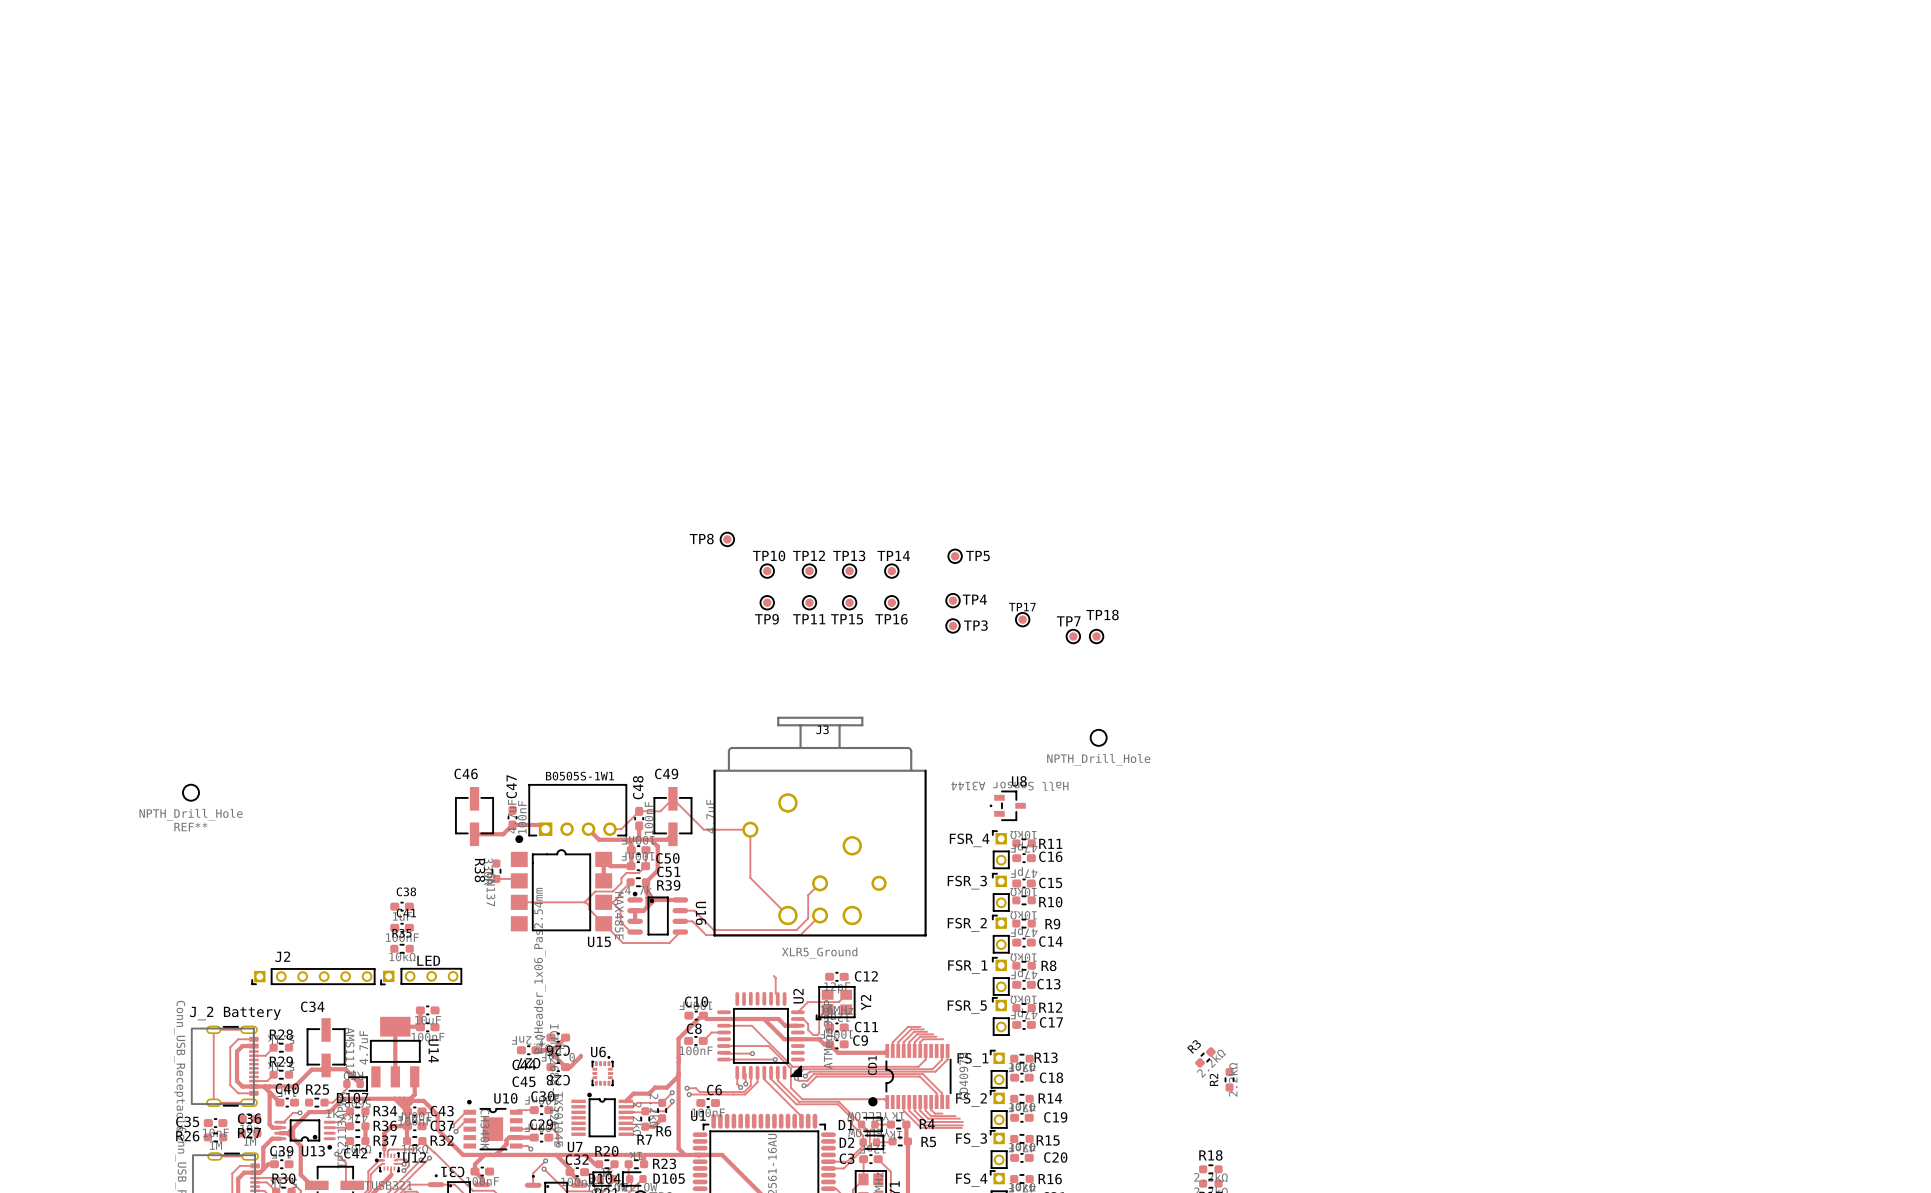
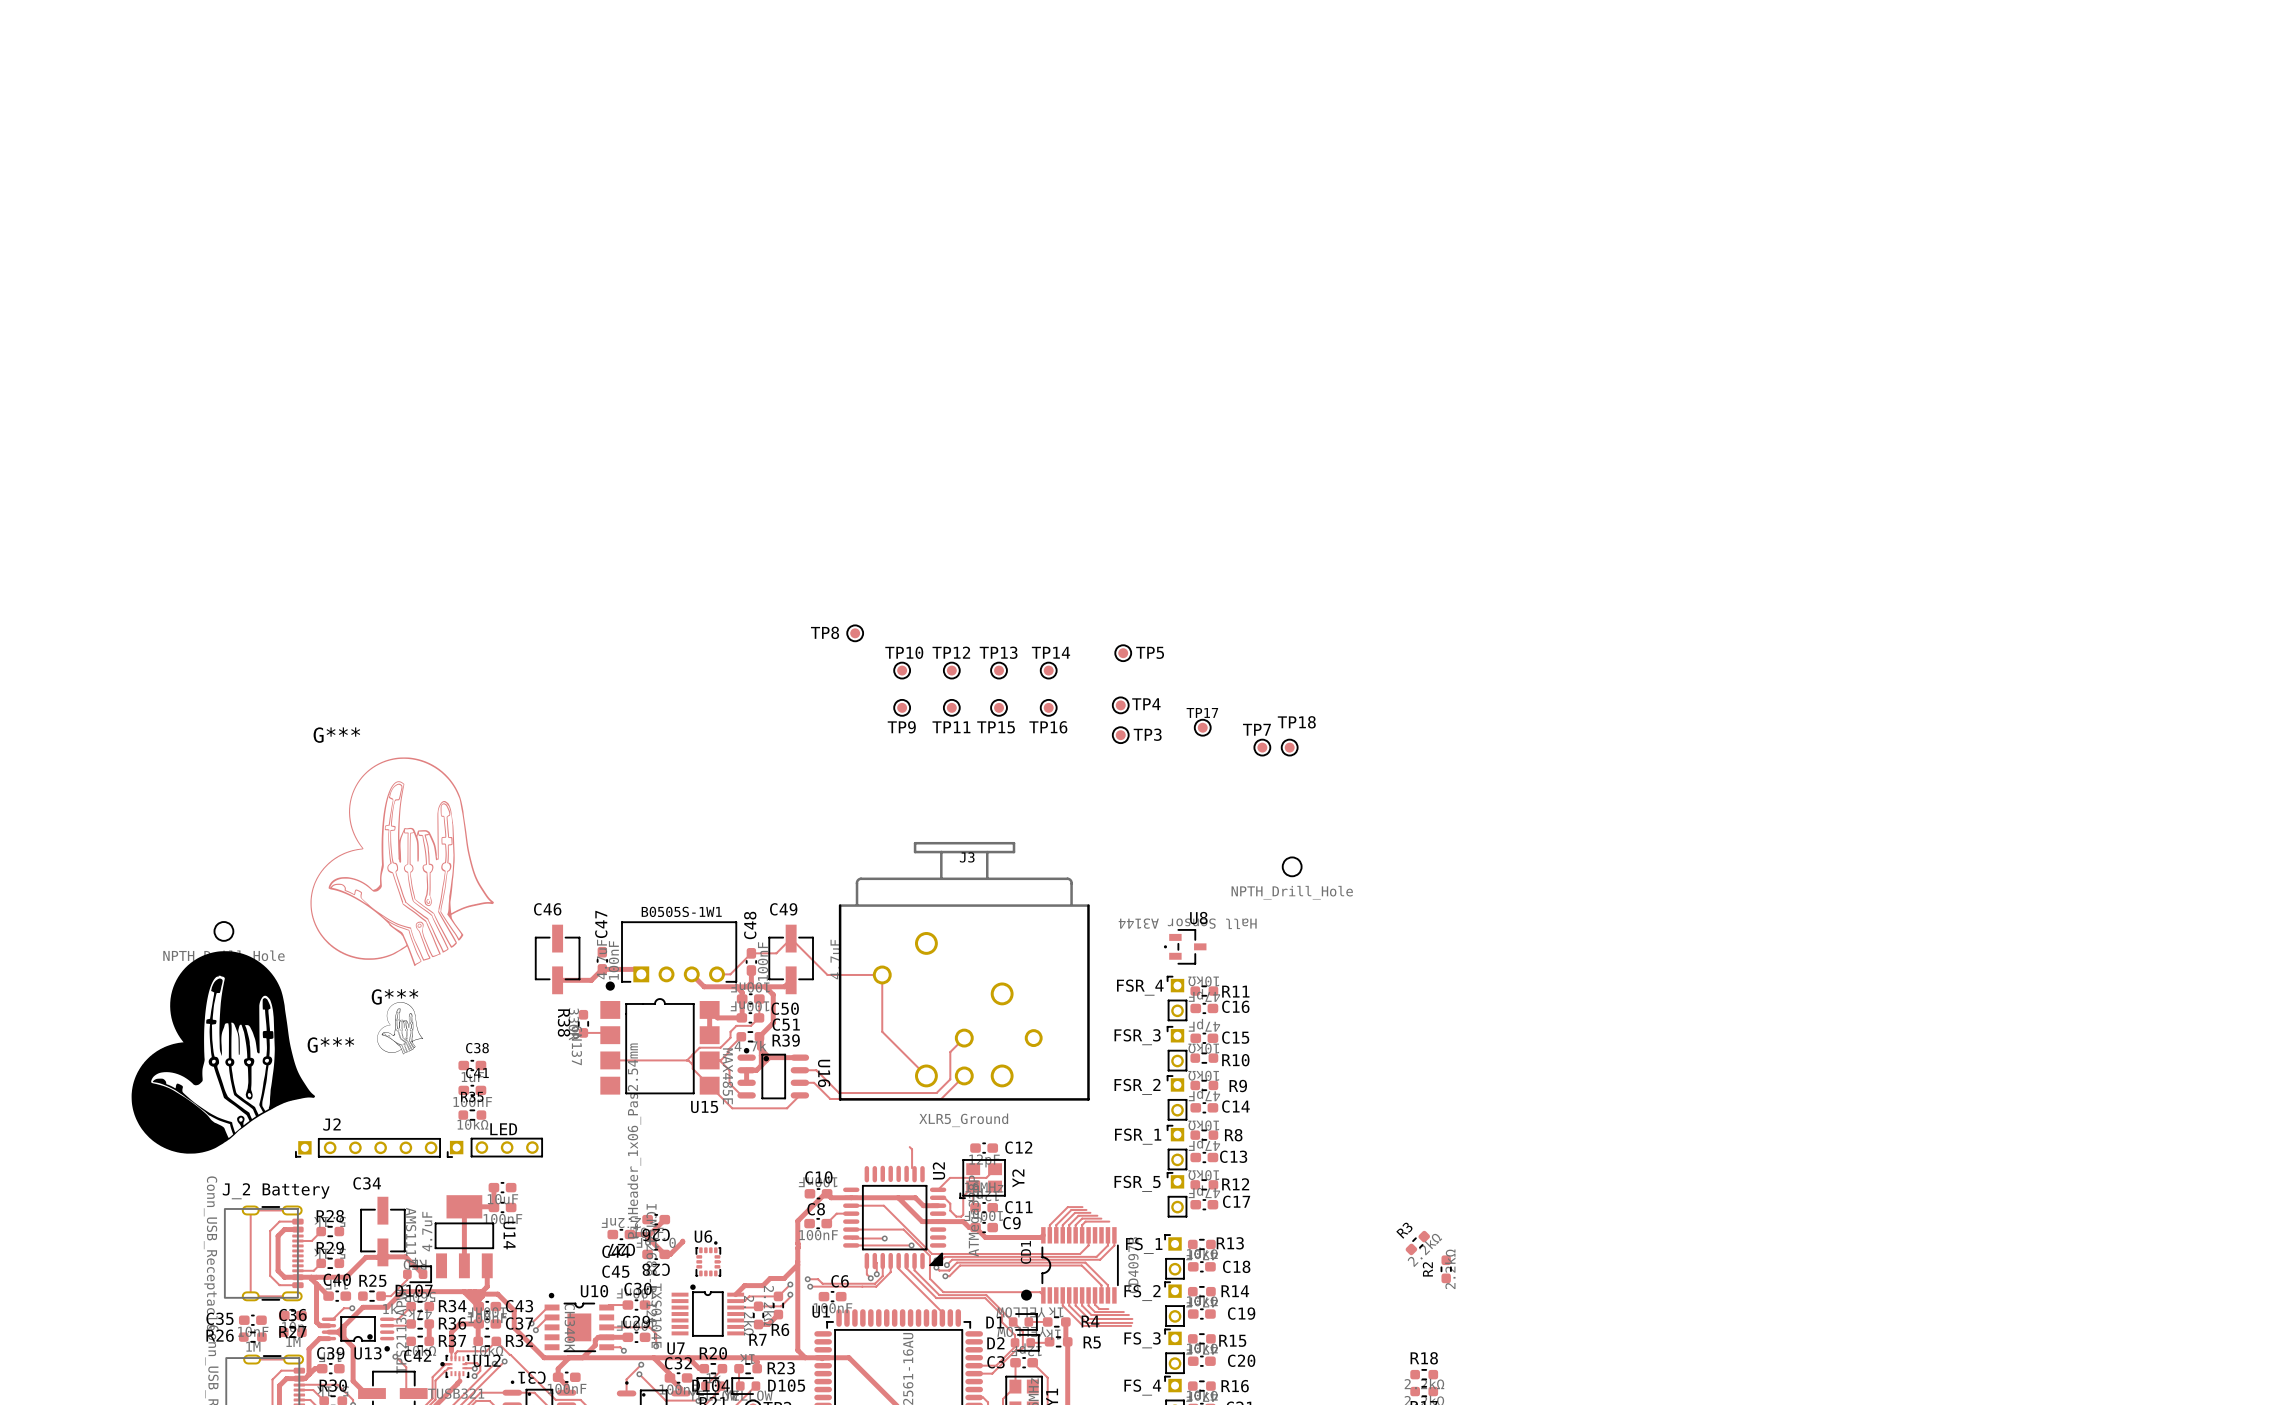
G***: none -> (402, 861)
G***: none -> (400, 1028)
G***: none -> (223, 1052)

